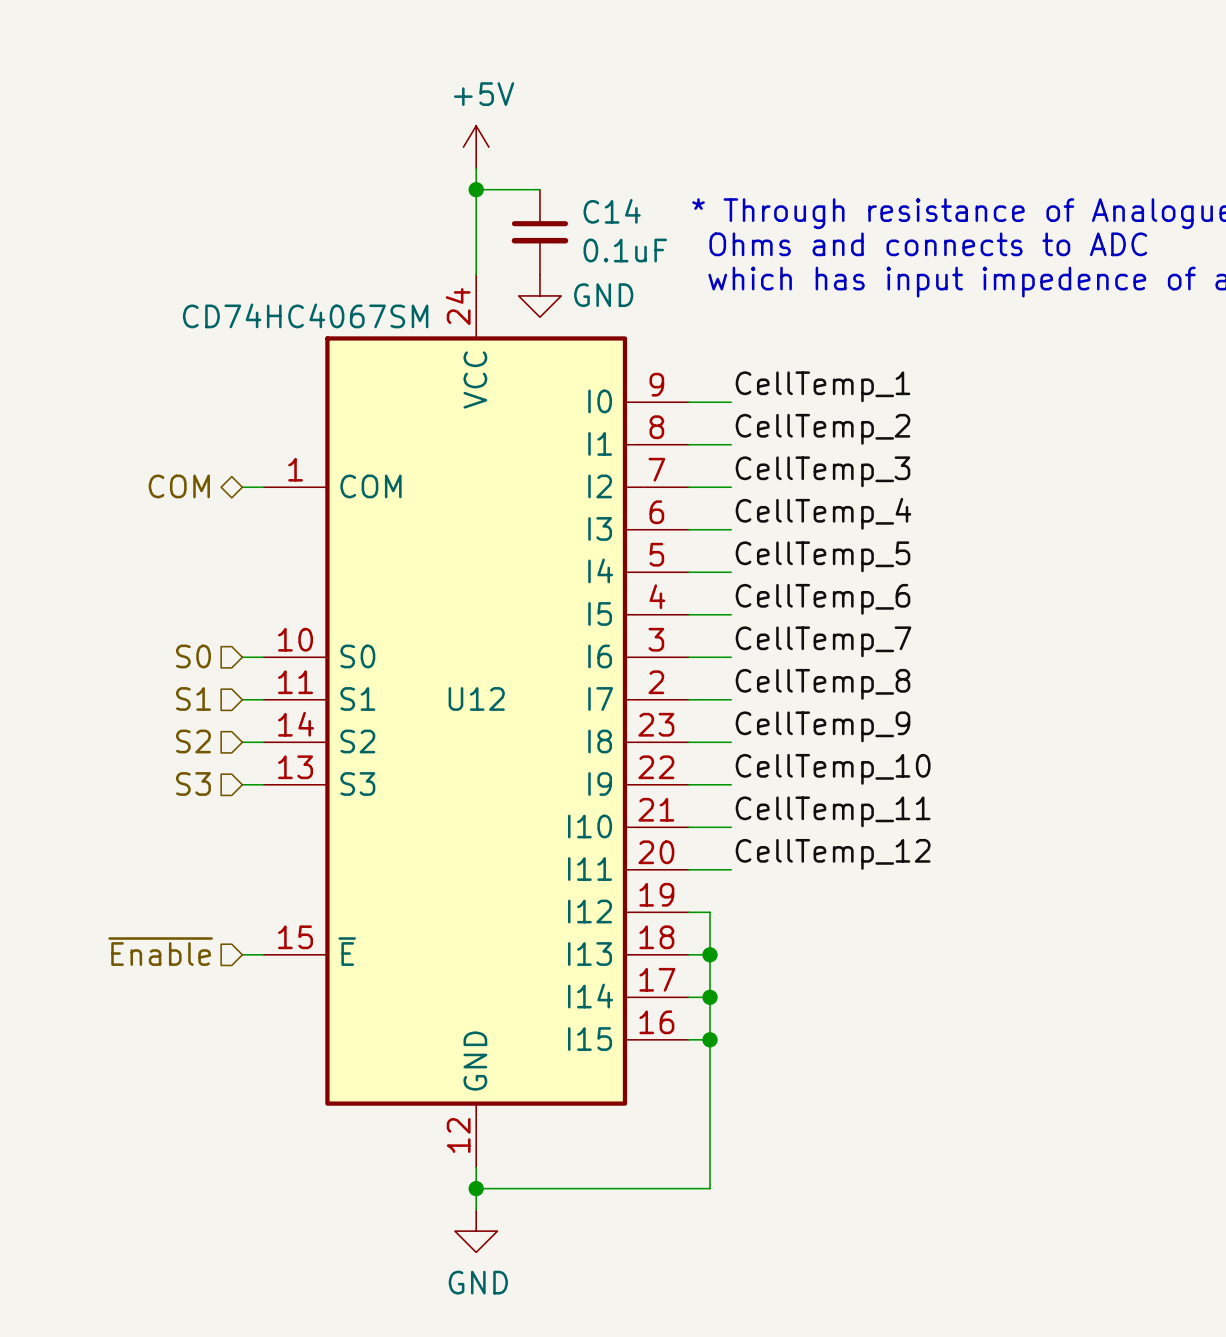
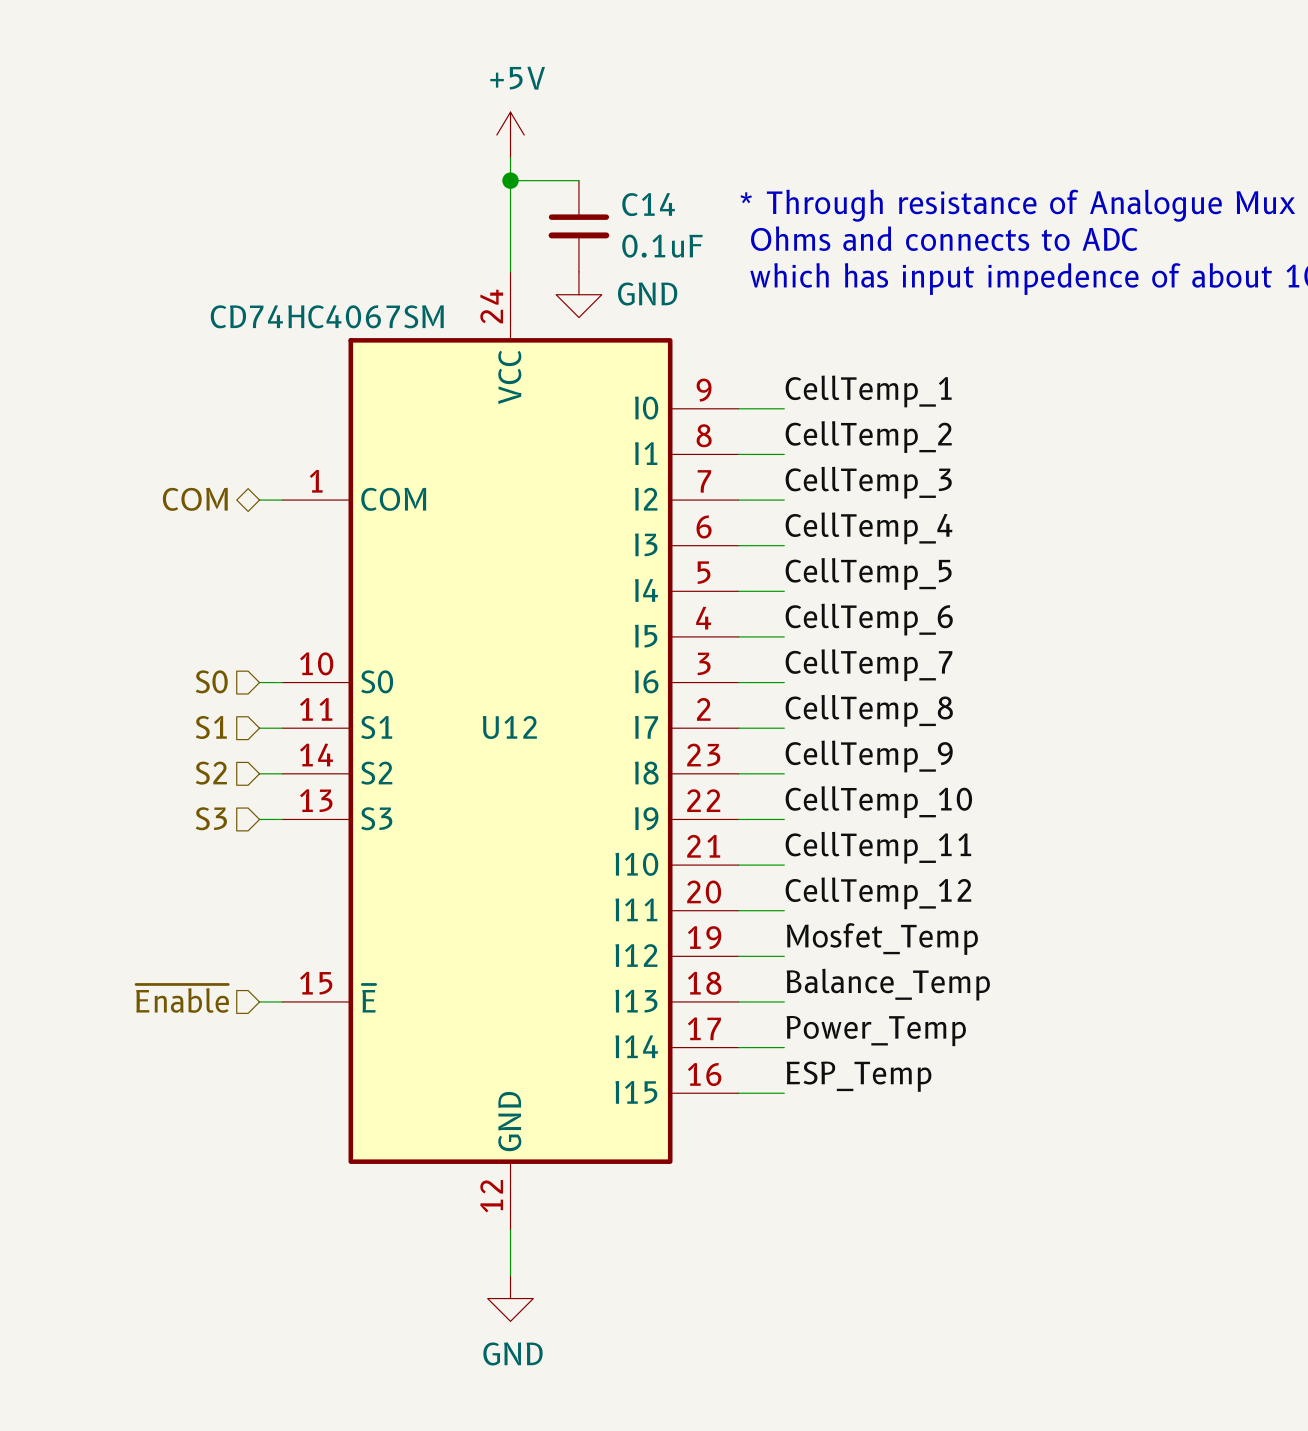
label: none -> Mosfet_Temp (882, 939)
wire: (709, 912) (709, 1188) (476, 1188) -> (761, 956) (784, 956)
label: none -> Balance_Temp (888, 984)
wire: none -> (761, 1001) (784, 1001)
junction: (709, 954) -> none
label: none -> Power_Temp (876, 1031)
wire: none -> (761, 1047) (784, 1047)
junction: (709, 997) -> none
label: none -> ESP_Temp (859, 1076)
wire: none -> (761, 1093) (784, 1093)
junction: (709, 1039) -> none
junction: (476, 1188) -> none

